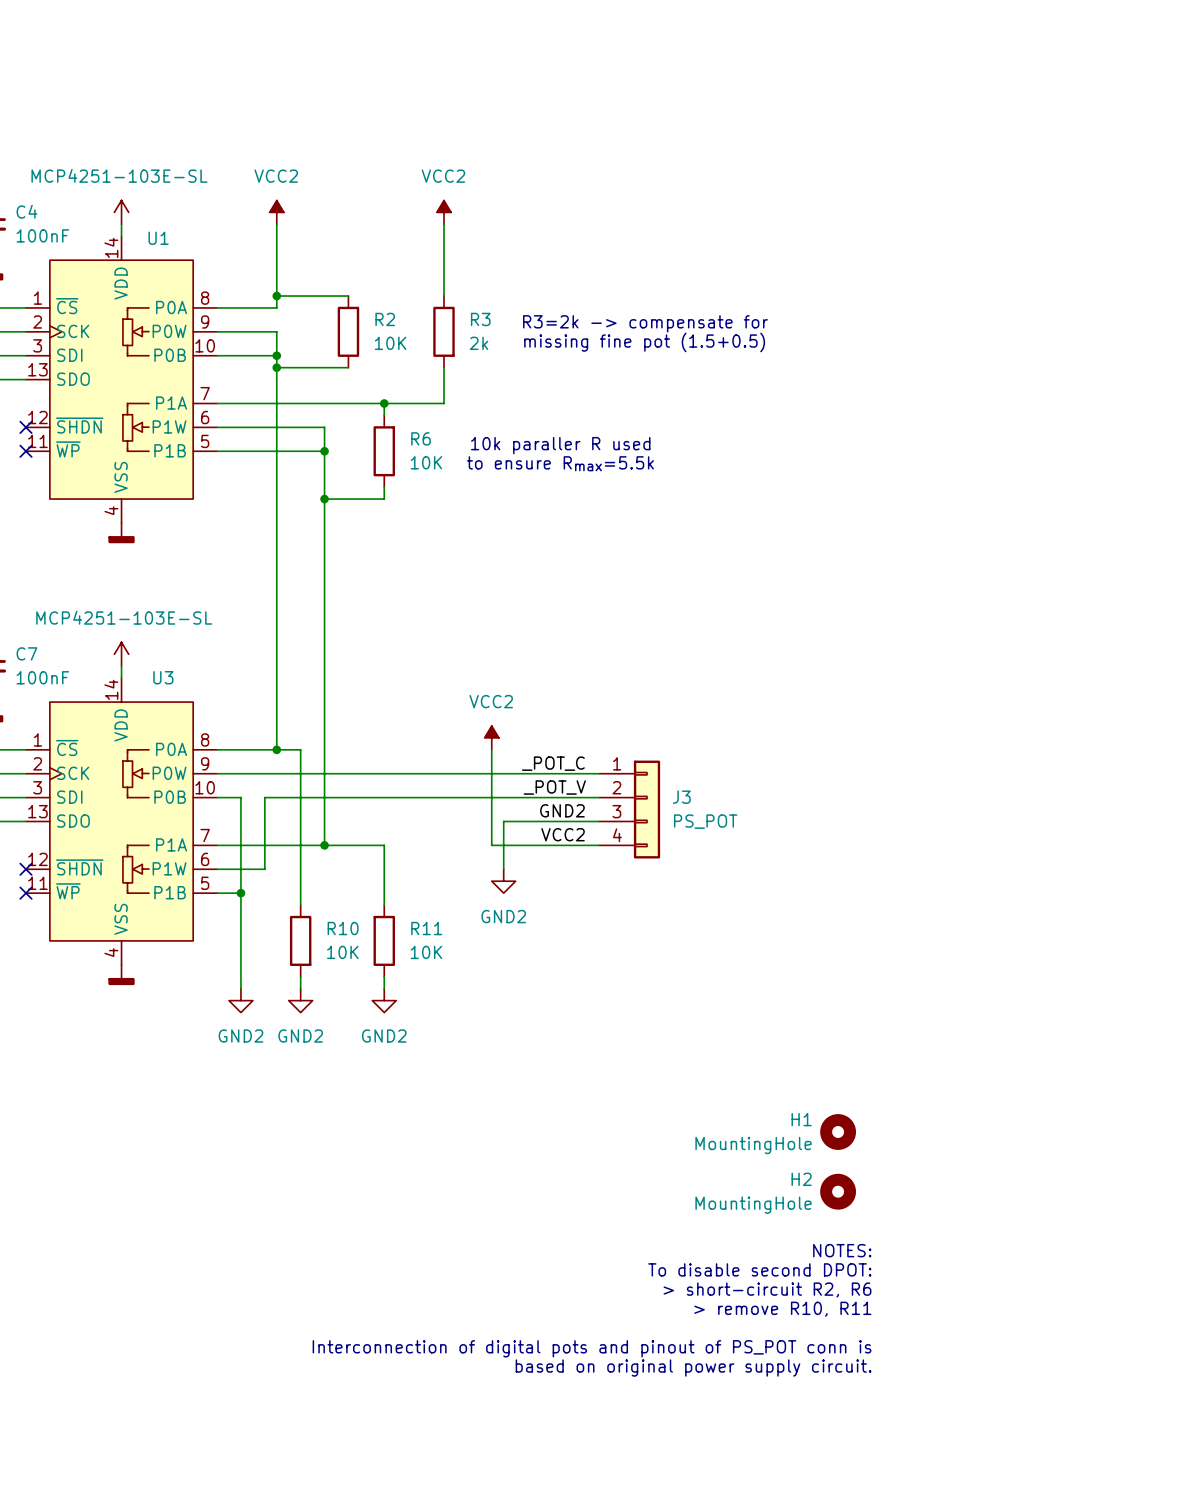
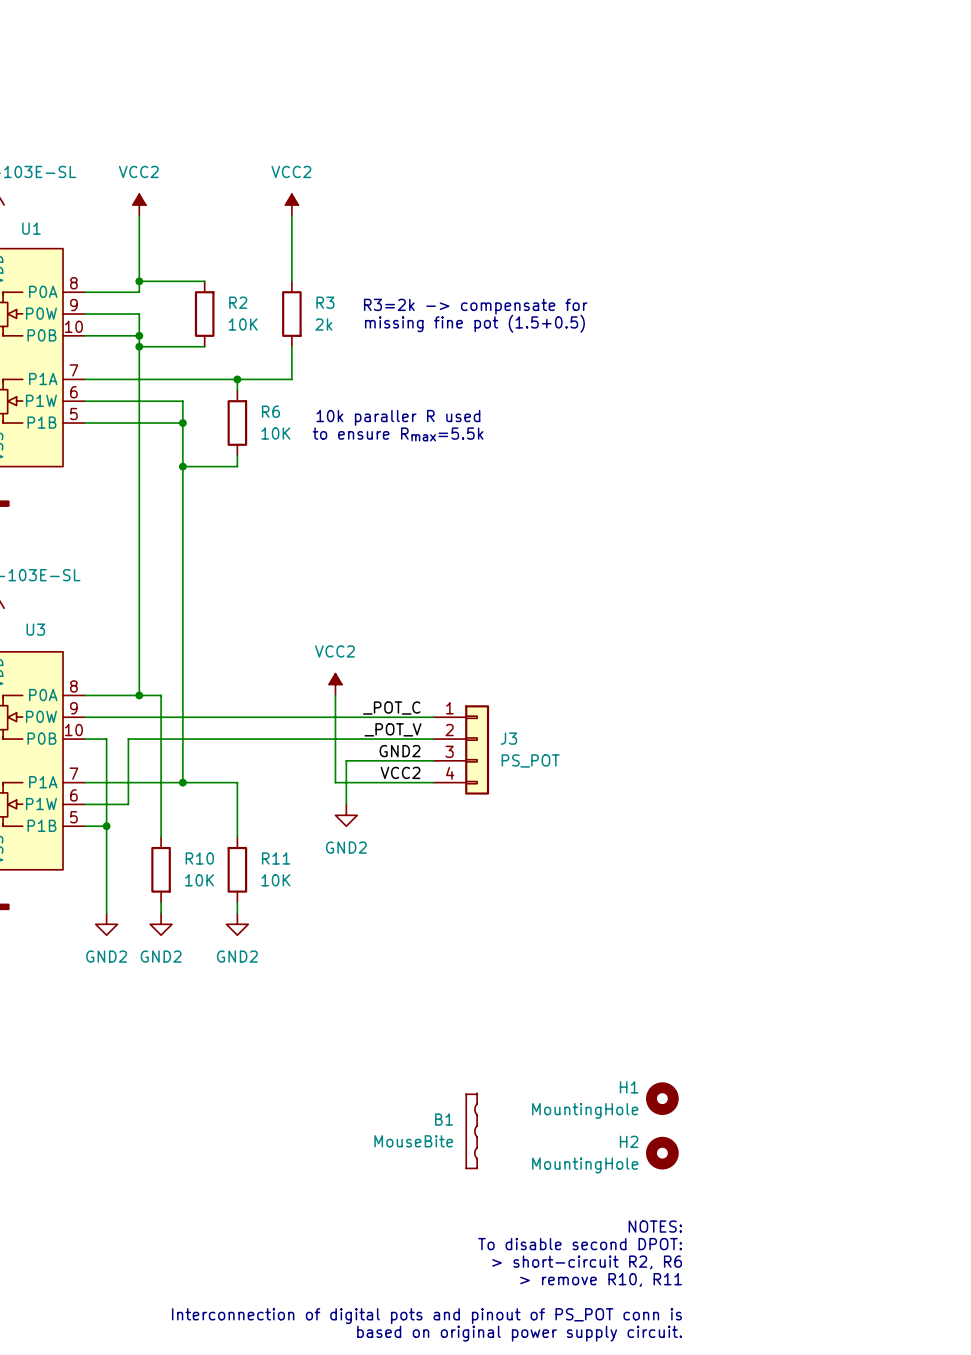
H1 position: (838, 1132) -> (662, 1098)
H2 position: (838, 1191) -> (662, 1153)
B1: none -> MouseBite (471, 1130)
text position: NOTES: (842, 1250) -> NOTES: (655, 1226)
text: To disable second DPOT: (759, 1269) -> none
text: > short-circuit R2, R6 (767, 1289) -> none
text position: > remove R10, R11 (782, 1309) -> > remove R10, R11 (601, 1279)
text: Interconnection of digital pots and pinout of PS_POT conn is (592, 1348) -> To disable second DPOT: (580, 1244)
text: based on original power supply circuit. (693, 1368) -> > short-circuit R2, R6 (587, 1262)
text: none -> Interconnection of digital pots and pinout of PS_POT conn is (426, 1316)
text: none -> based on original power supply circuit. (519, 1333)

